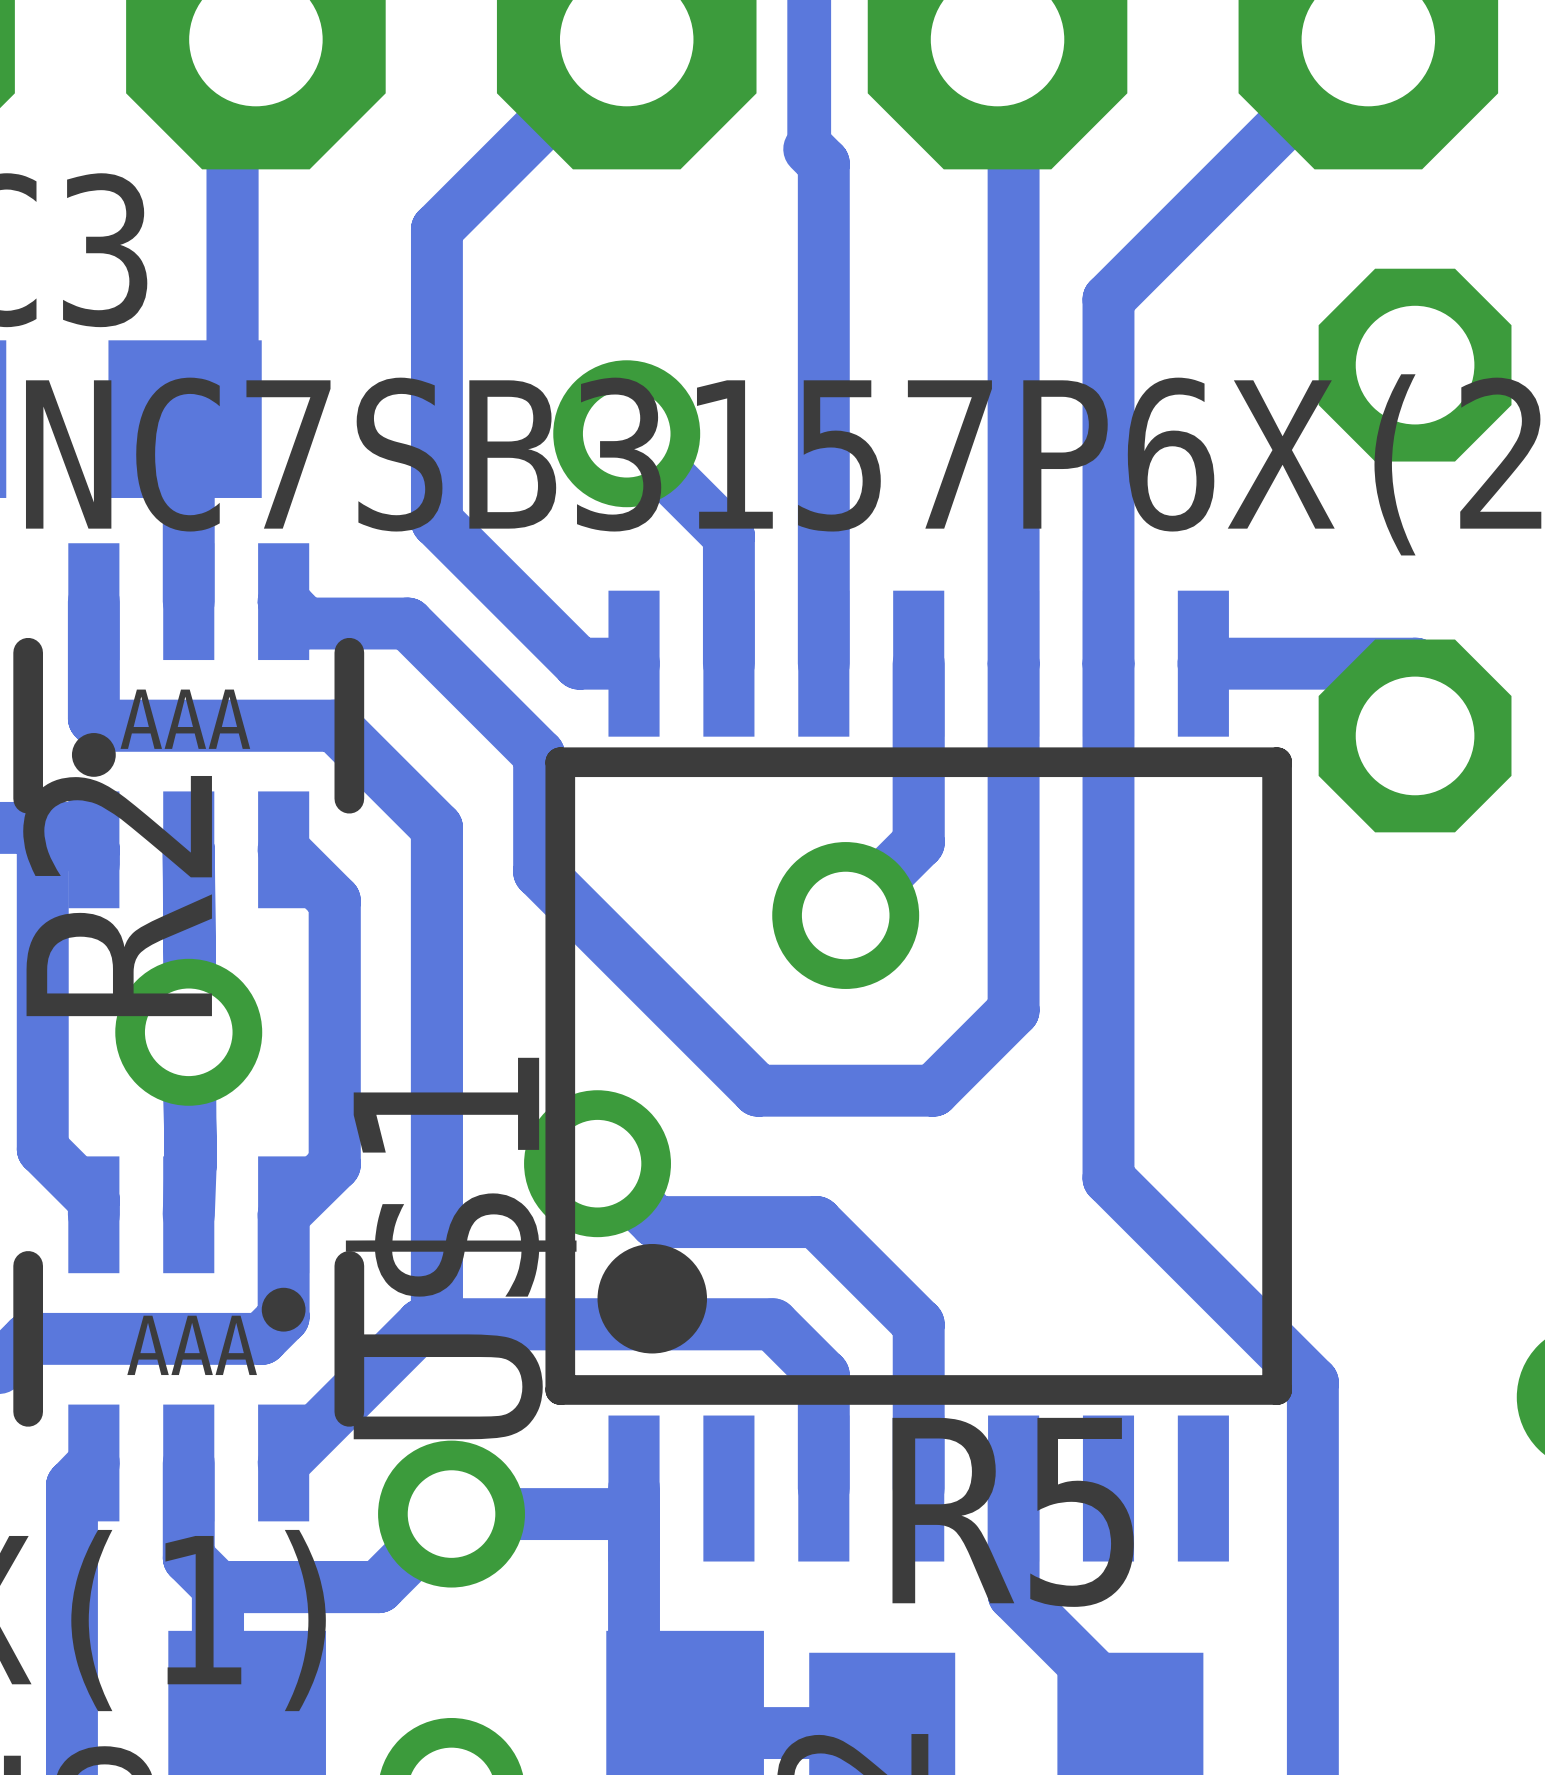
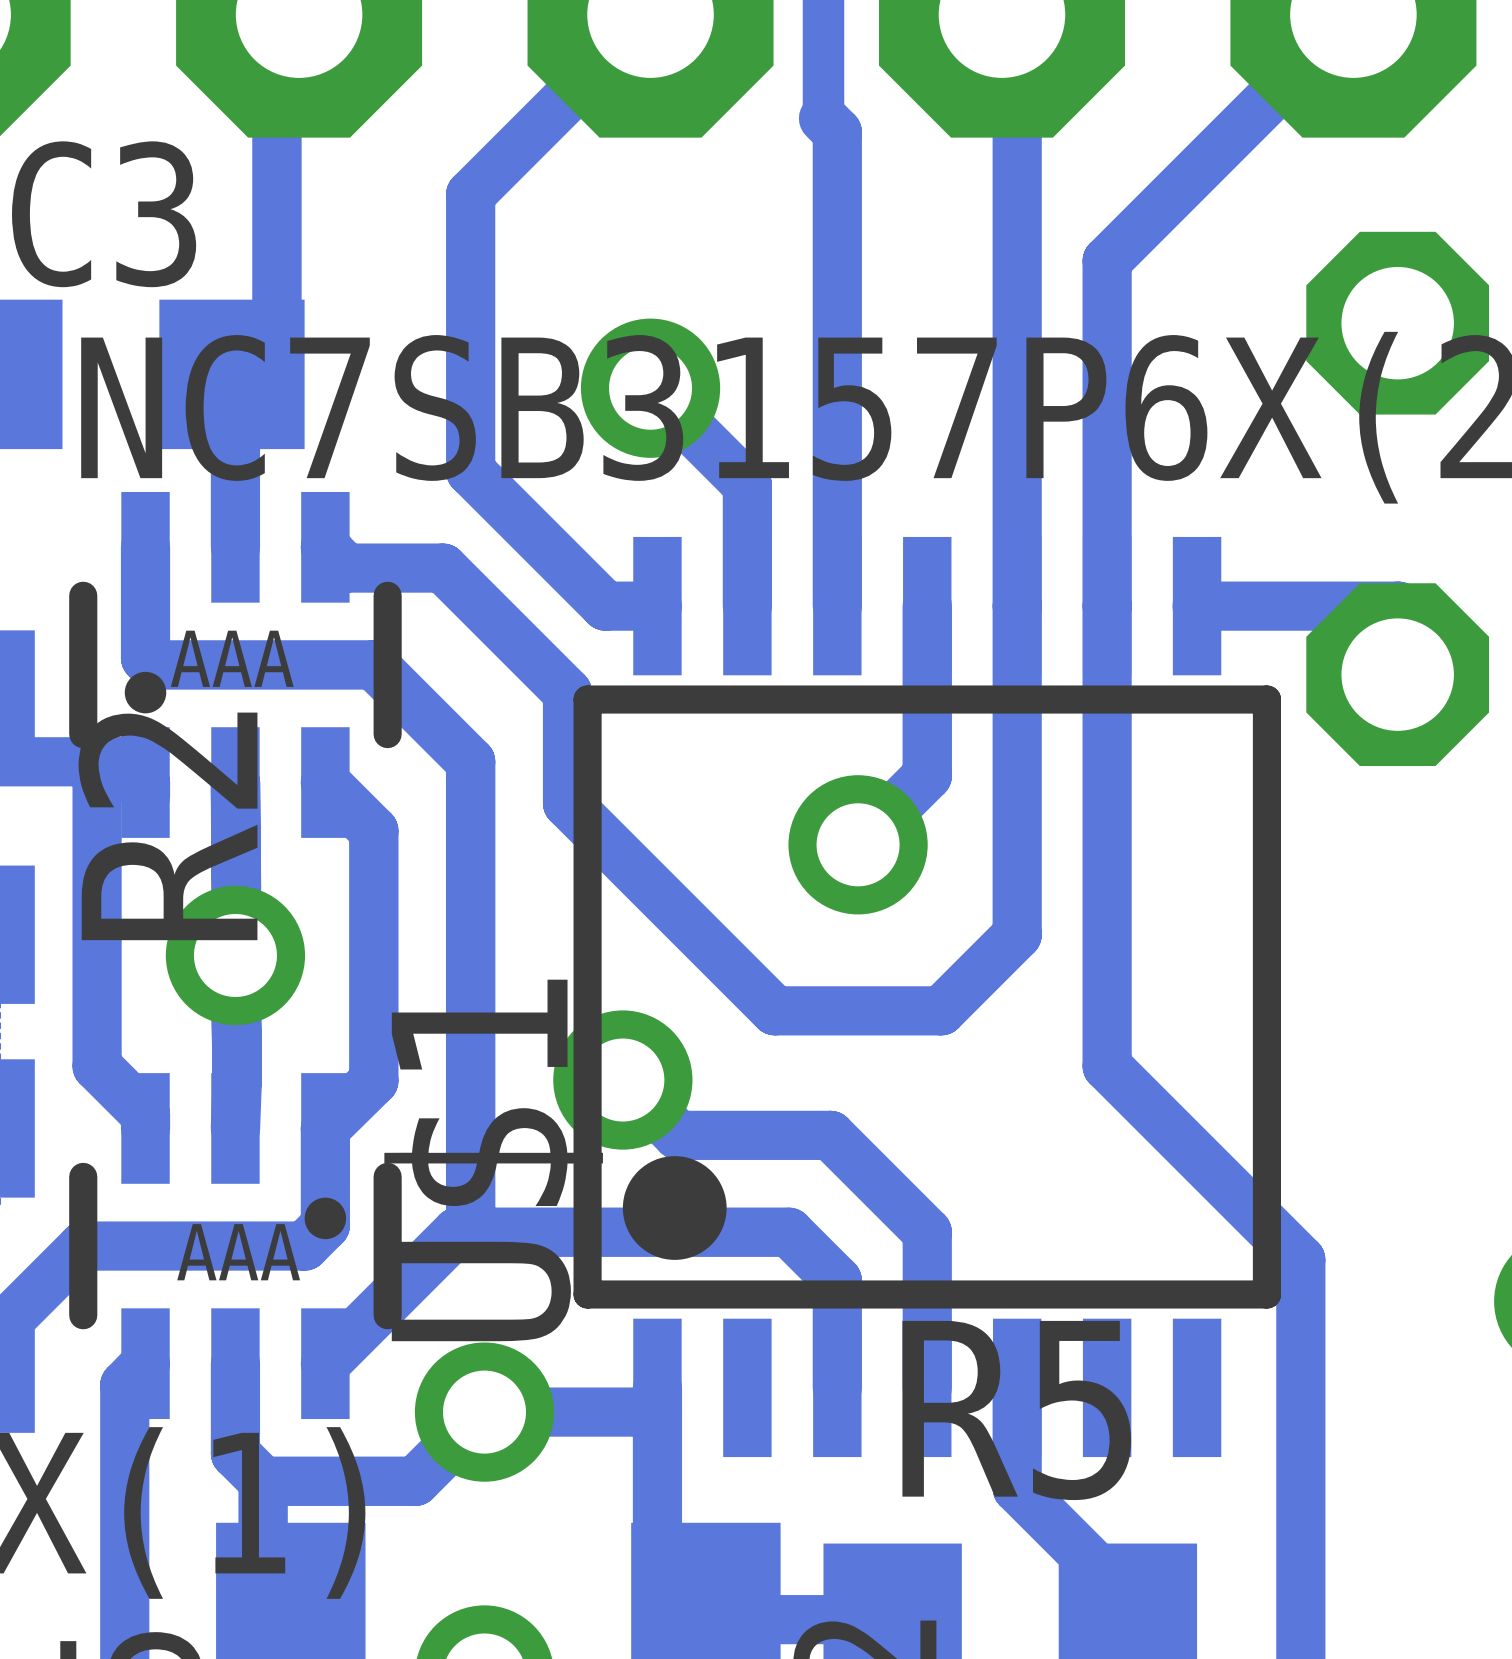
track: (1108, 1149) (1108, 1178) (1312, 1382) -> (1107, 1066) (1300, 1259) (1300, 1287)

